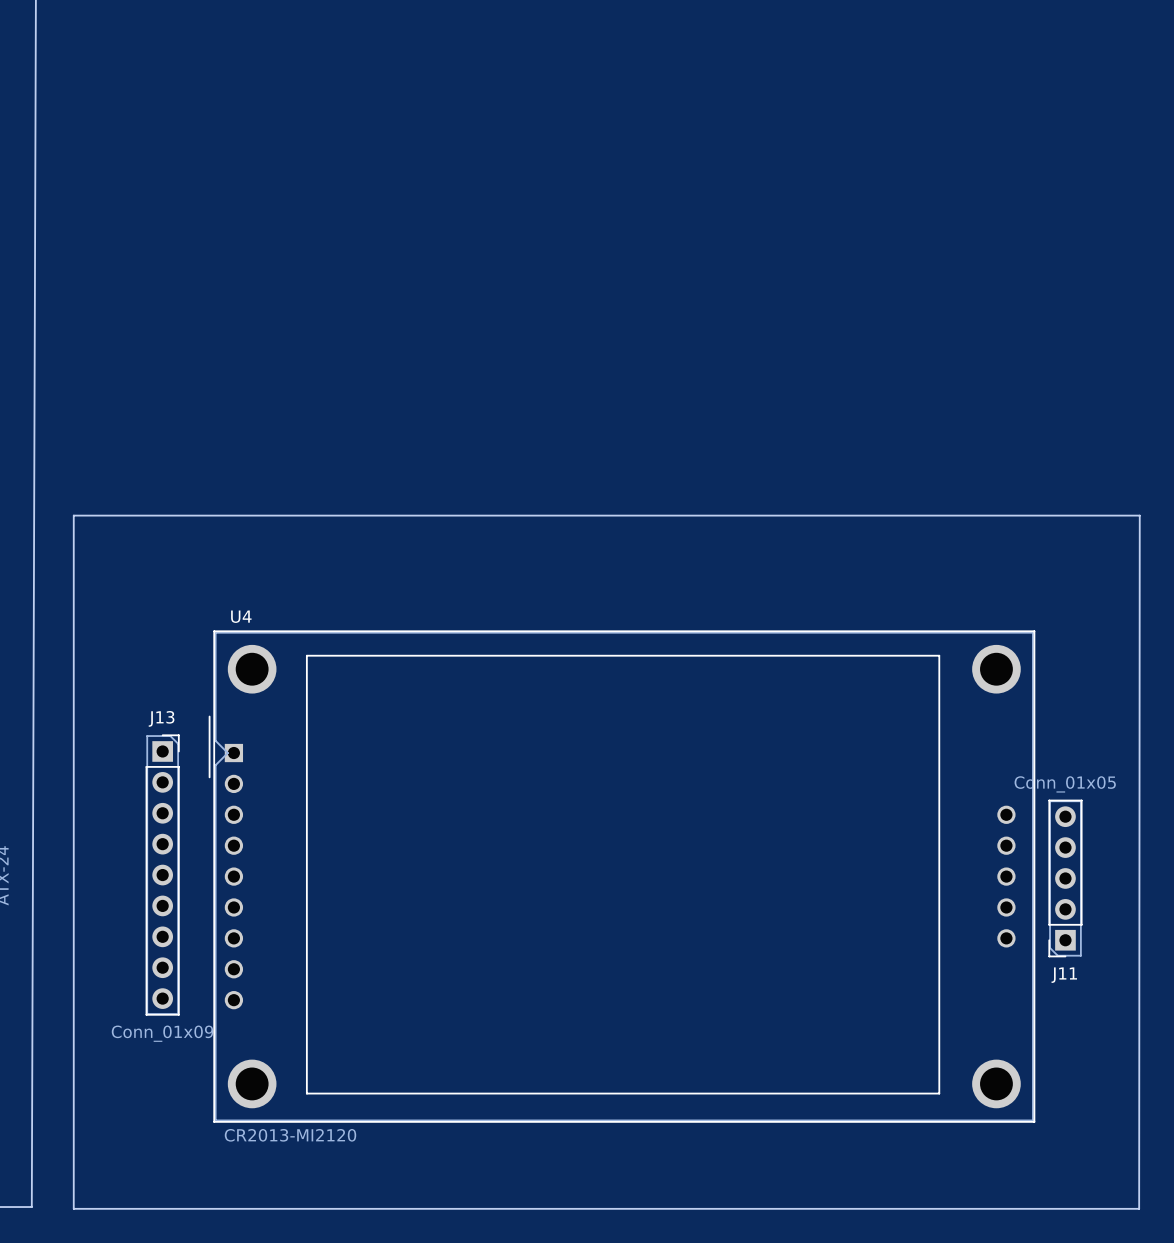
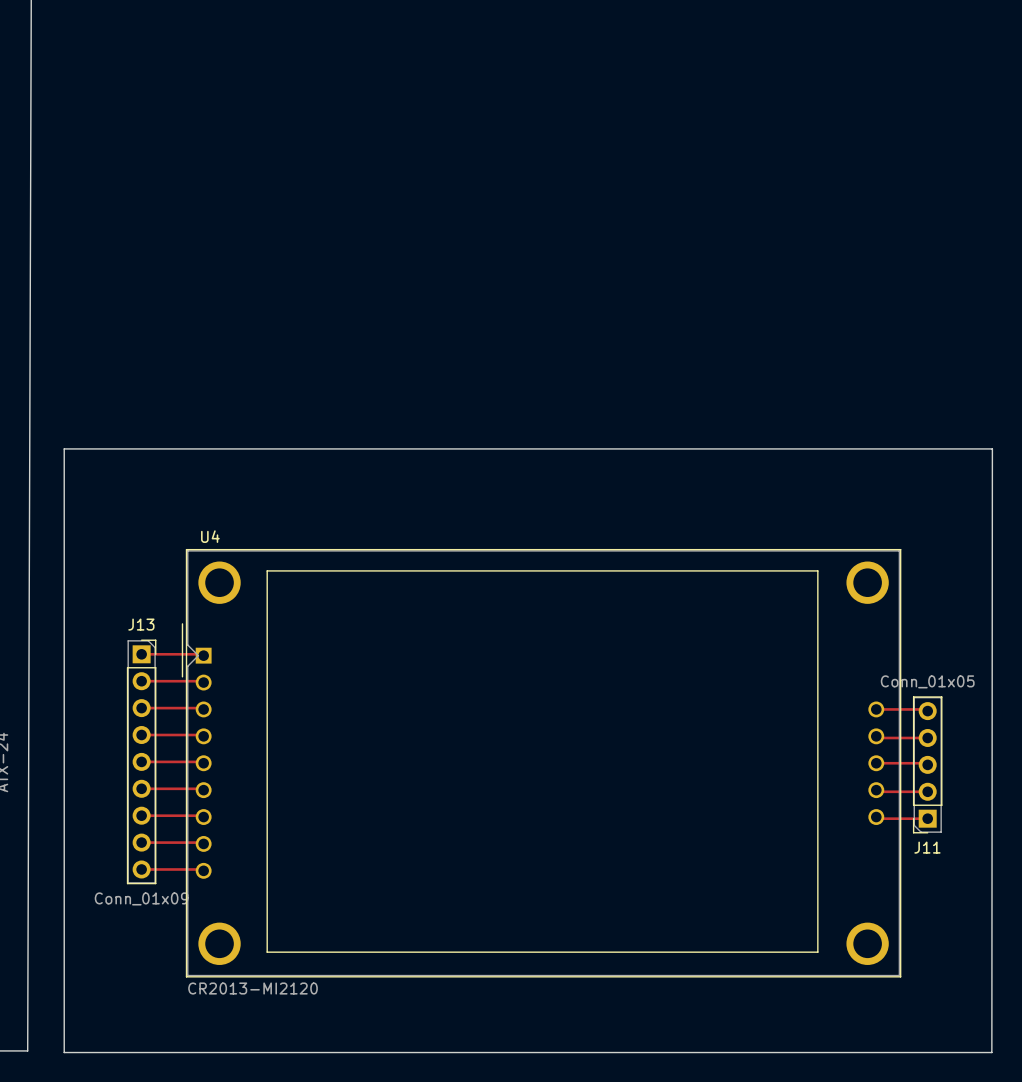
track: none -> (141, 654) (203, 655)
track: none -> (141, 681) (203, 682)
track: none -> (141, 708) (203, 709)
track: none -> (876, 709) (926, 709) (927, 711)
track: none -> (141, 735) (203, 736)
track: none -> (876, 736) (877, 737) (927, 737)
track: none -> (141, 761) (203, 763)
track: none -> (876, 763) (926, 763) (927, 764)
track: none -> (141, 788) (203, 790)
track: none -> (876, 790) (877, 791) (927, 791)
track: none -> (141, 815) (203, 817)
track: none -> (876, 817) (877, 818) (927, 818)
track: none -> (141, 842) (203, 843)
track: none -> (141, 869) (203, 870)

